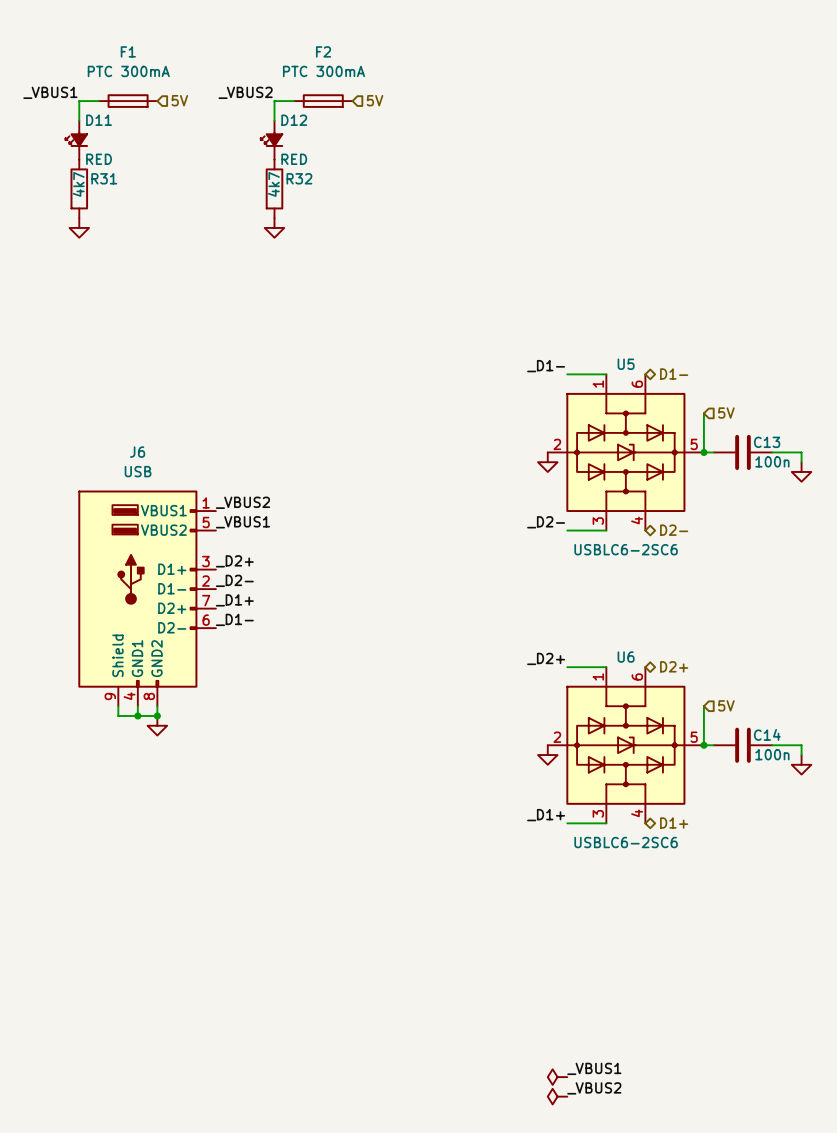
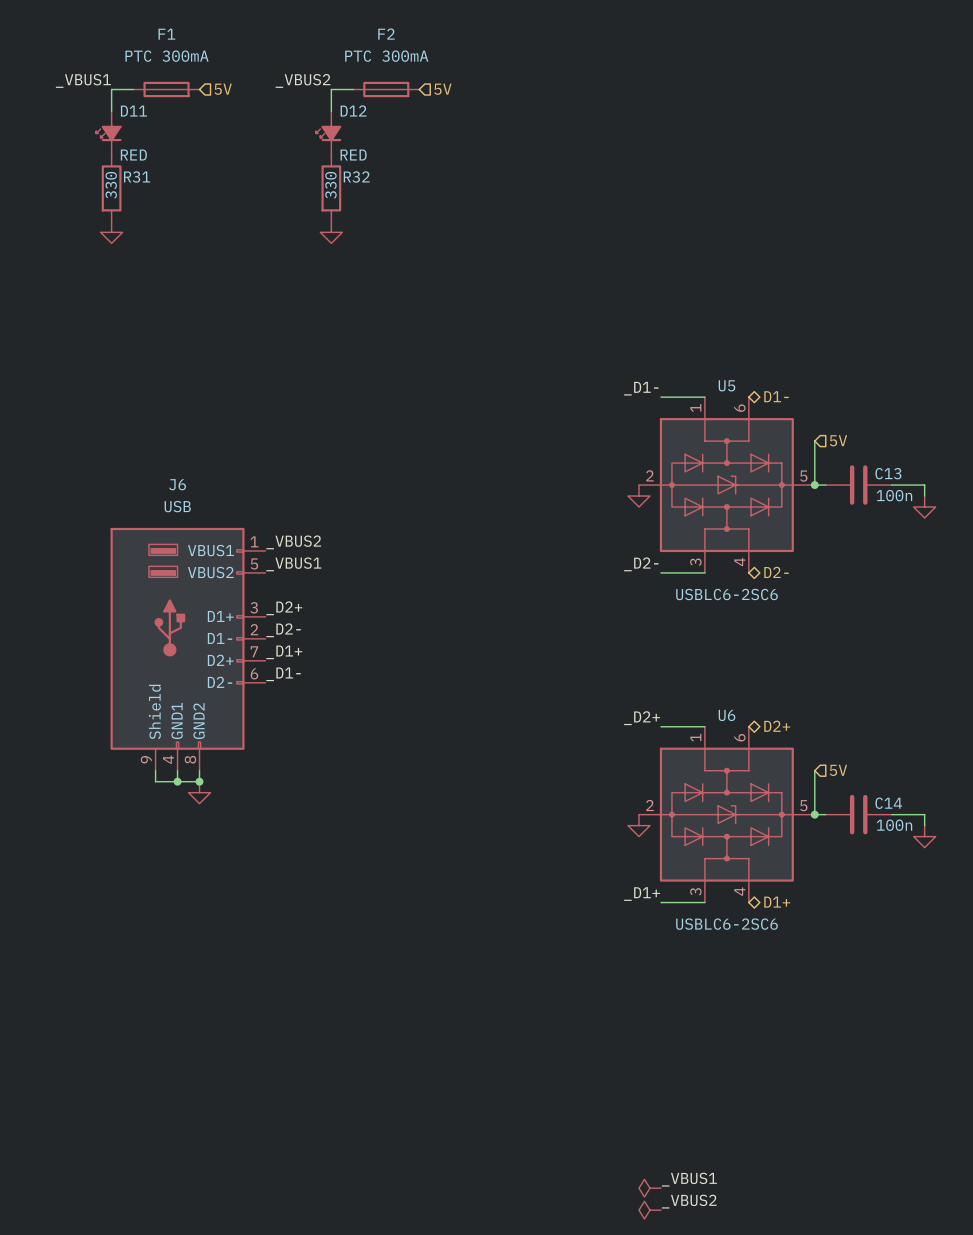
R31 value: 4k7 (78, 184) -> 330 (111, 185)
R32 value: 4k7 (273, 184) -> 330 (330, 185)

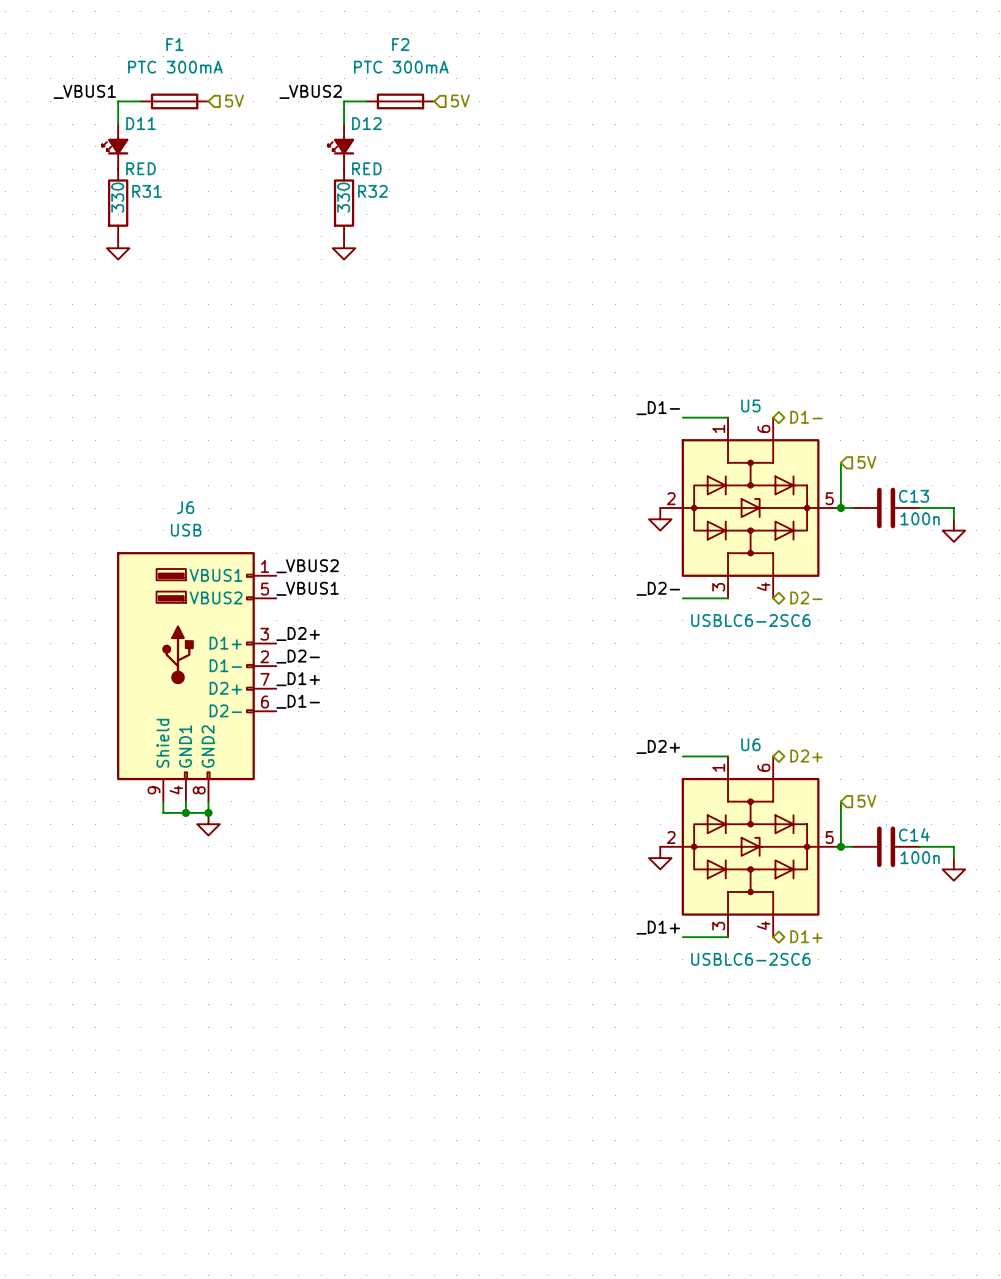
label: _VBUS1 (689, 1179) -> none
power symbol: (649, 1188) -> none
label: _VBUS2 (689, 1201) -> none
power symbol: (649, 1210) -> none

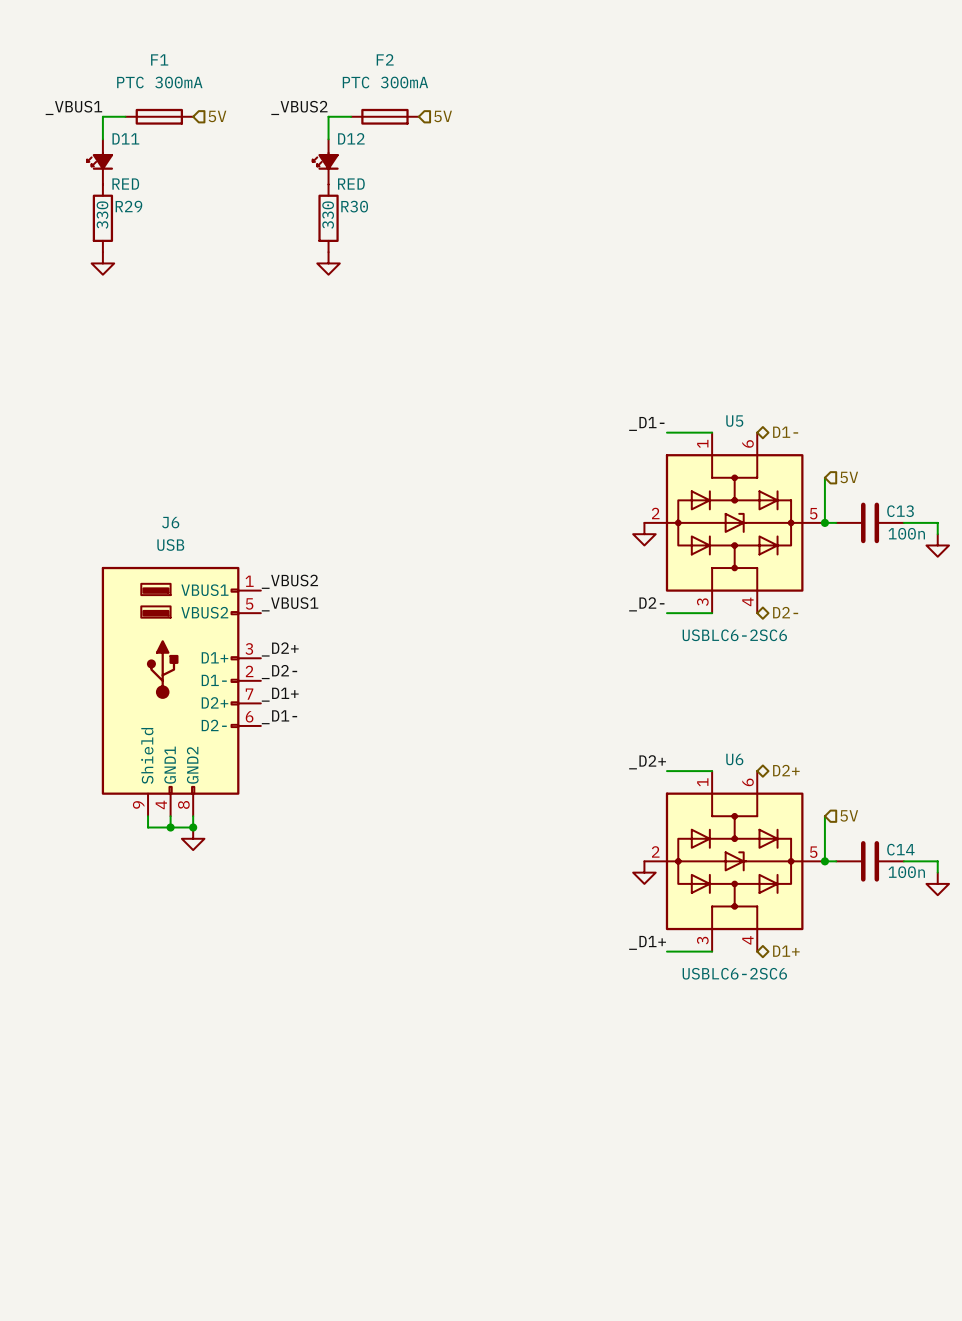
R31 name: R31 (147, 191) -> R29 (128, 206)
R32 name: R32 (372, 191) -> R30 (354, 206)

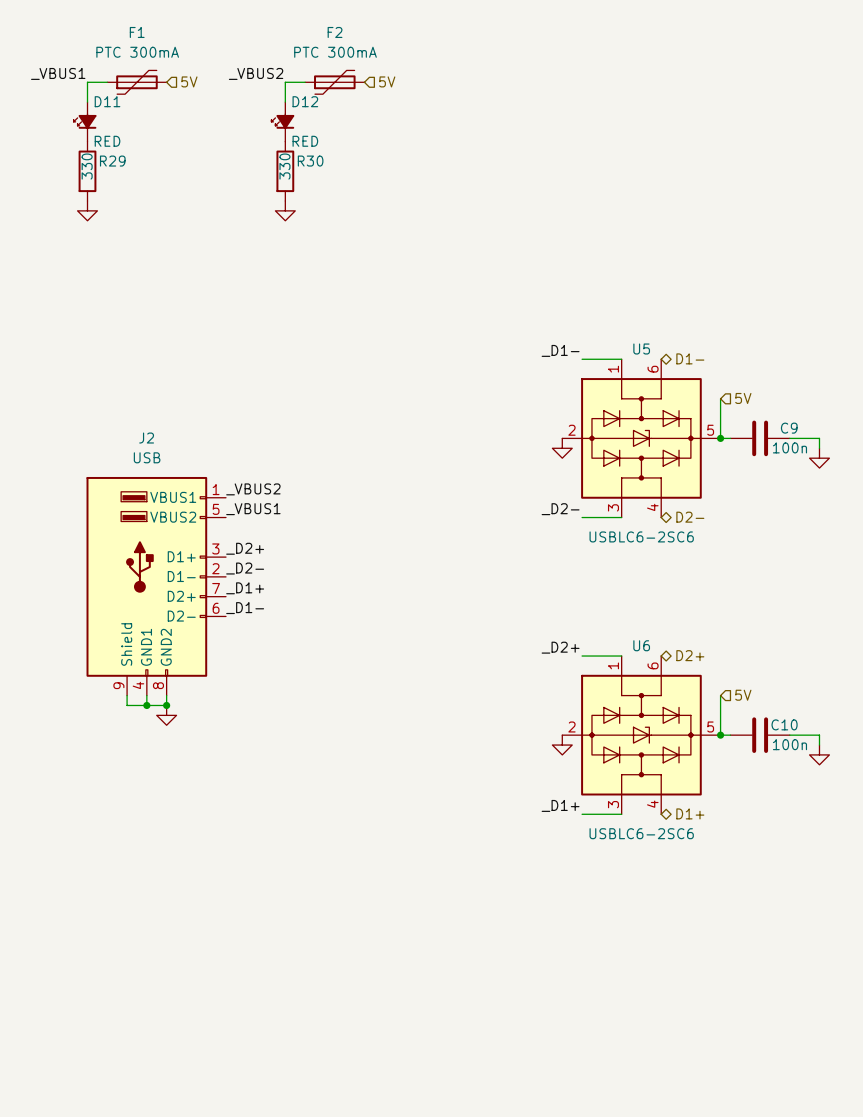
F1 symbol: [125, 108, 194, 125] -> [107, 70, 167, 95]
F2 symbol: [351, 108, 419, 125] -> [305, 70, 365, 95]
C13 name: C13 (900, 511) -> C9 (789, 428)
J6 name: J6 (170, 522) -> J2 (146, 438)
C14 name: C14 (900, 849) -> C10 (784, 724)

